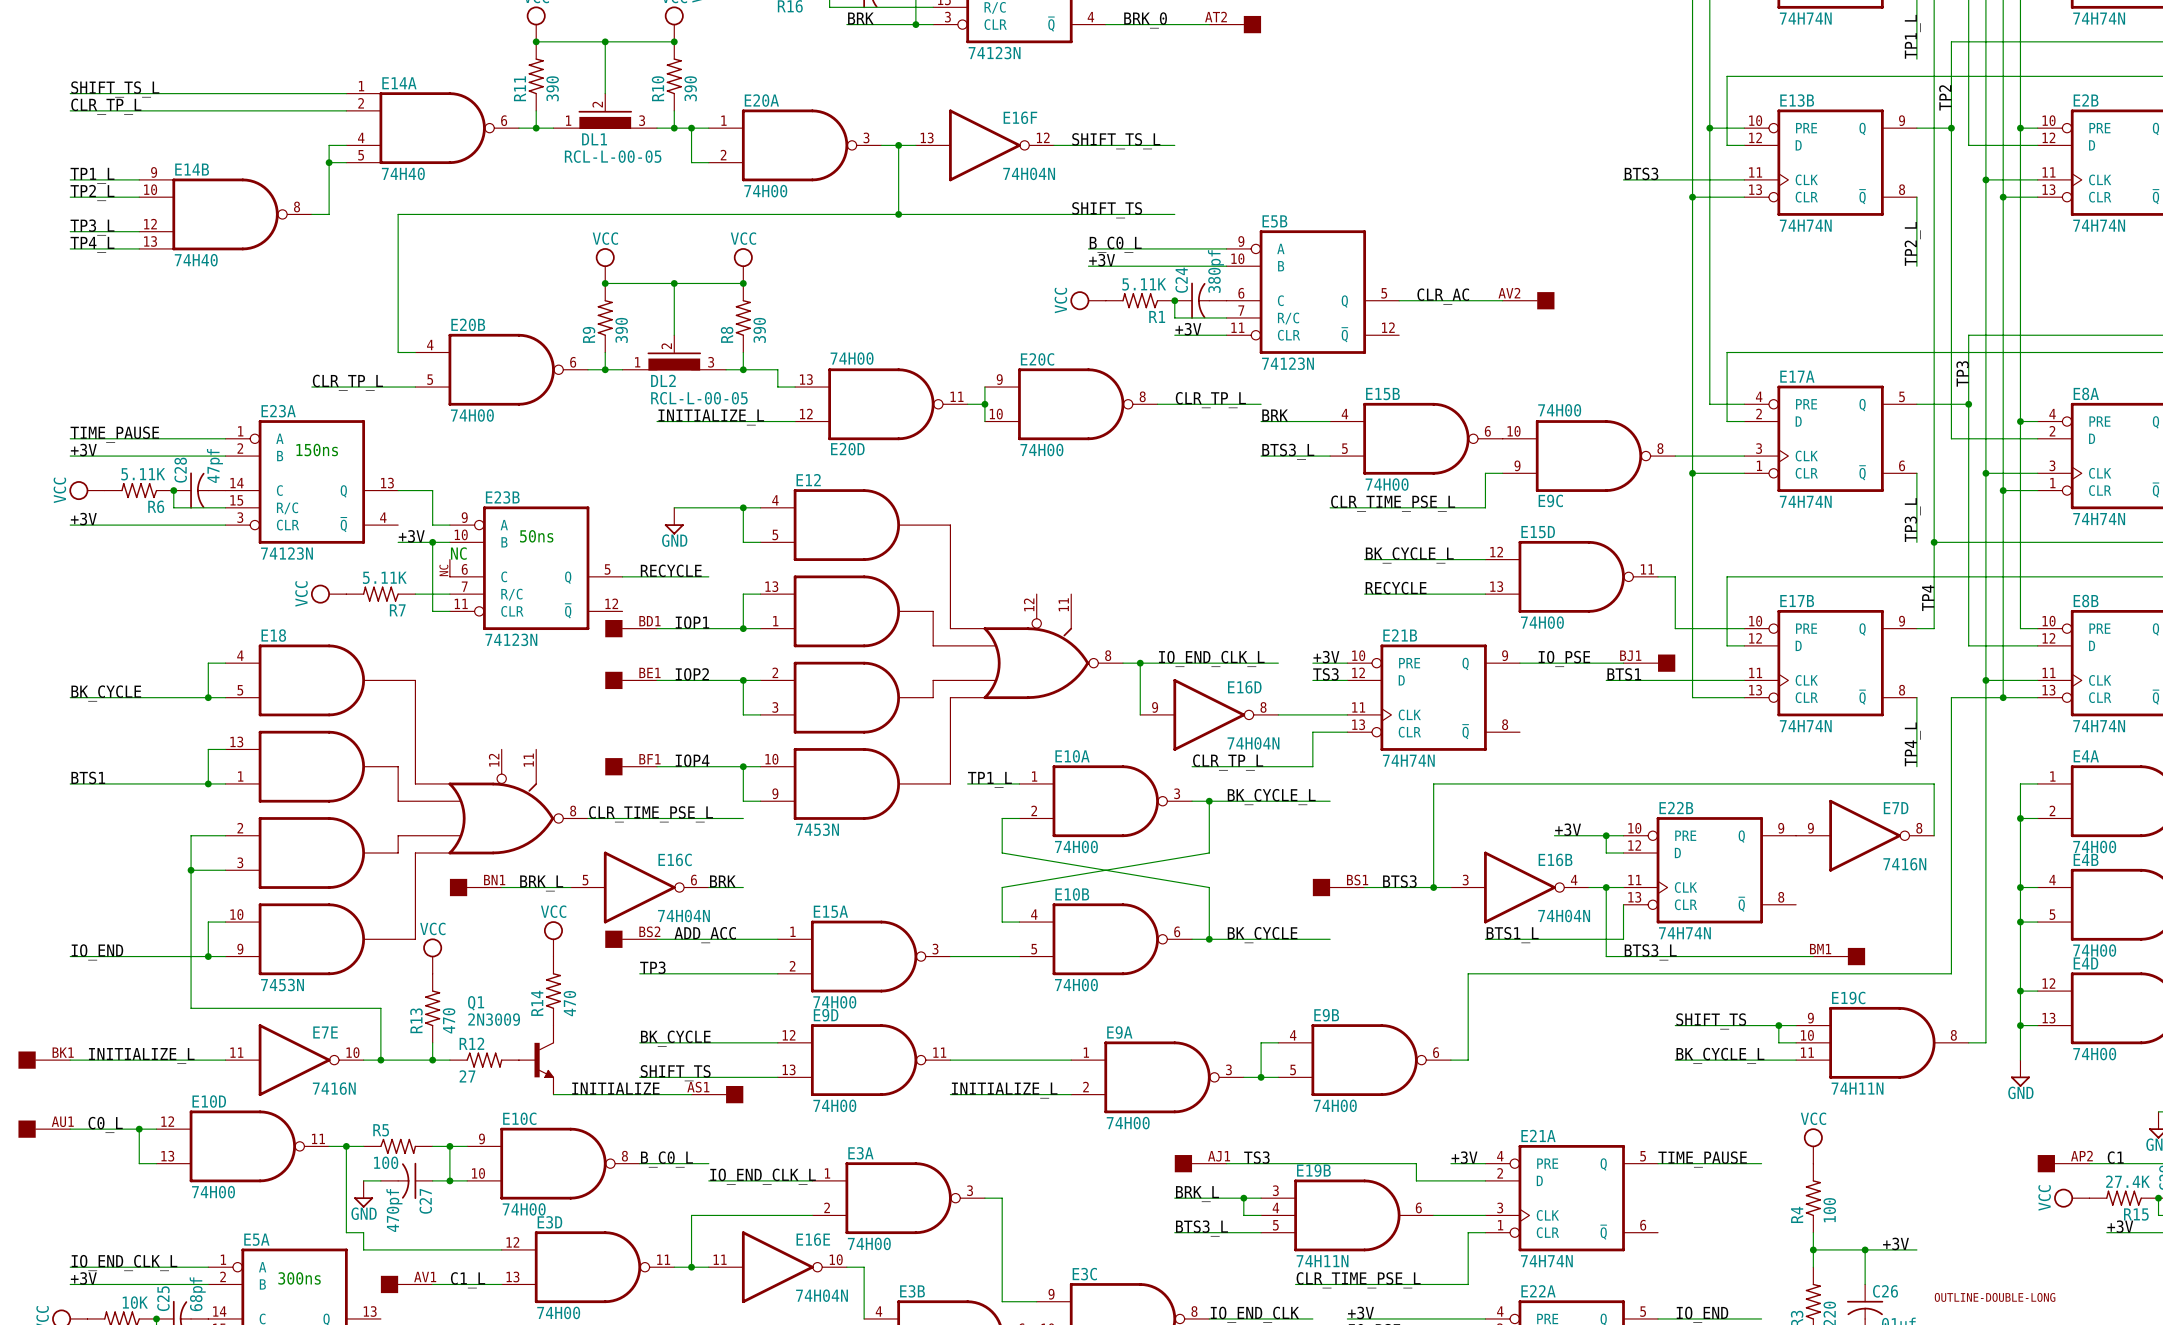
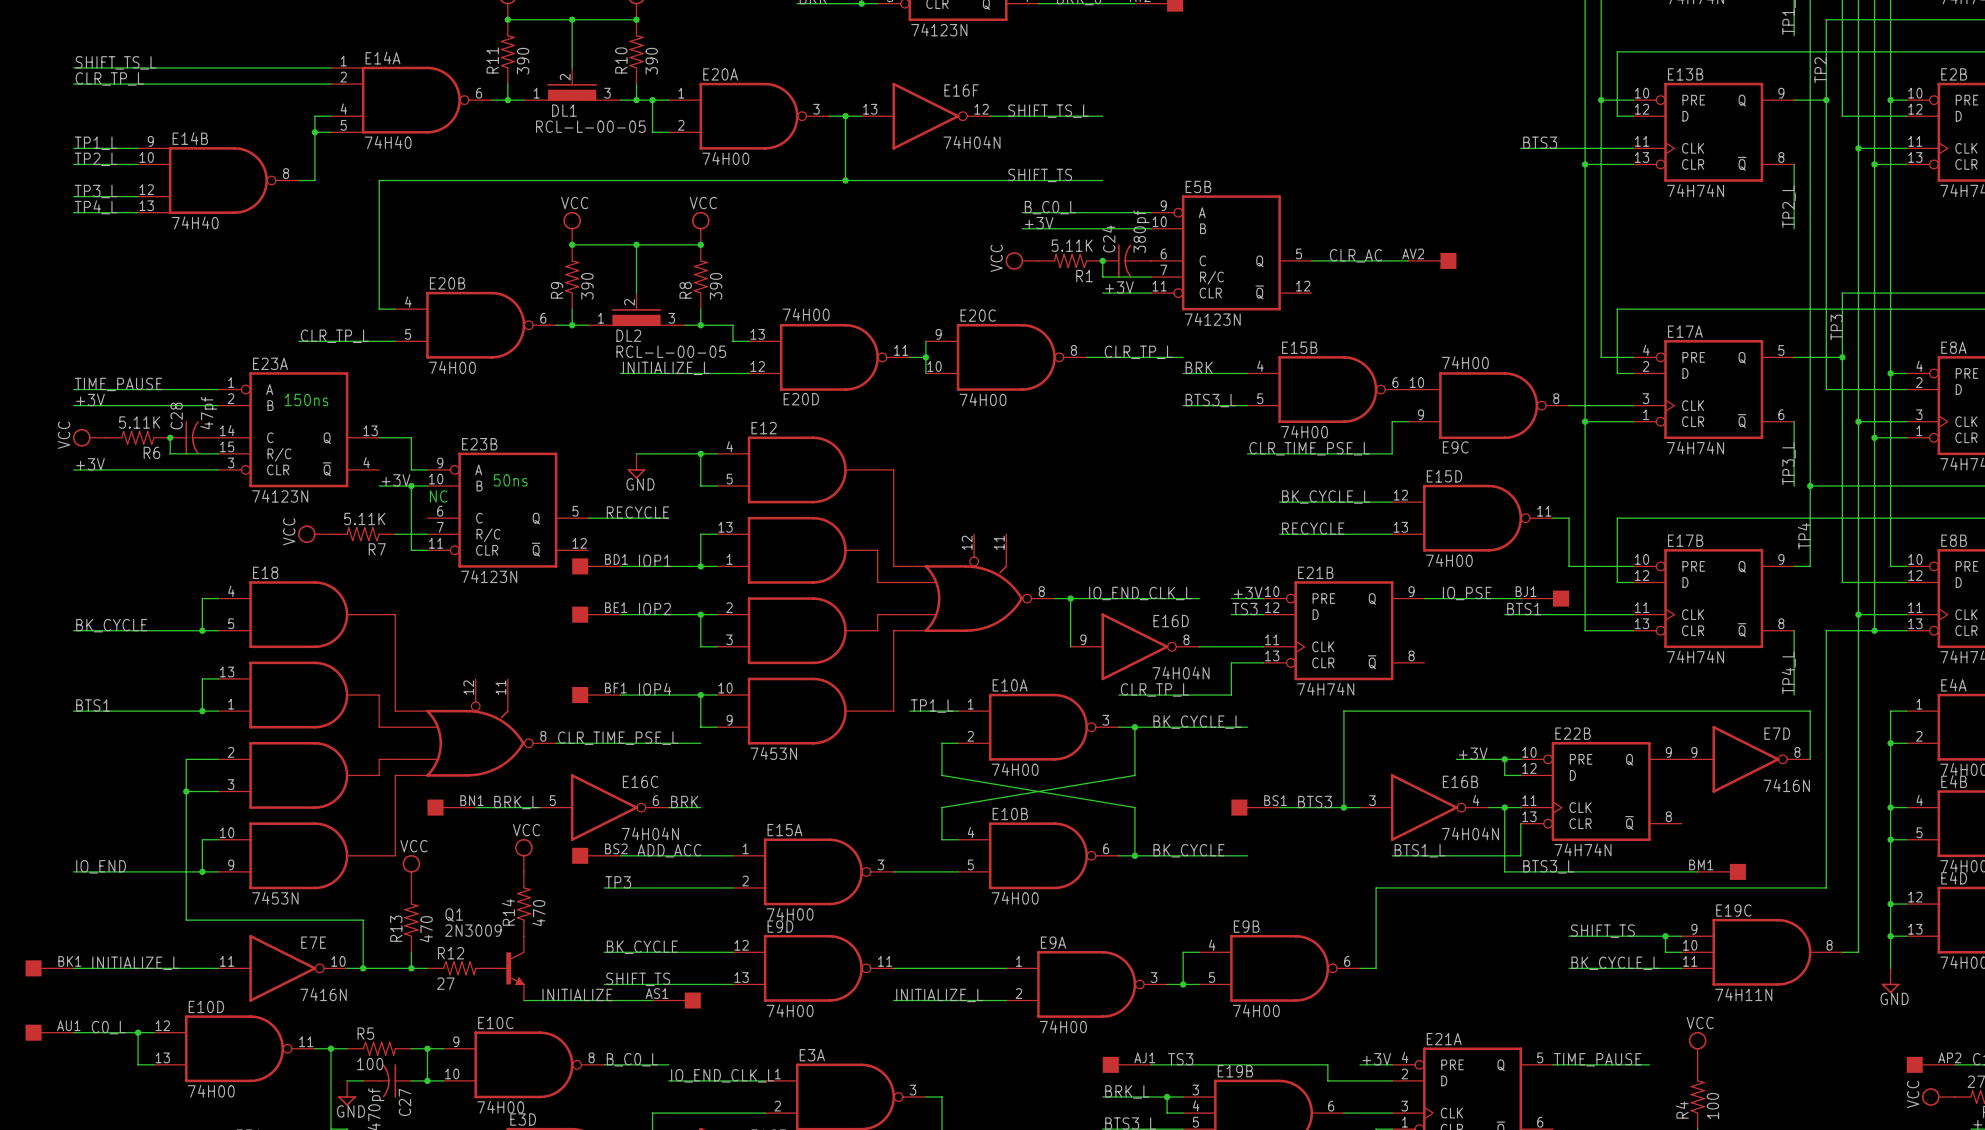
power symbol: (449, 568) -> none

